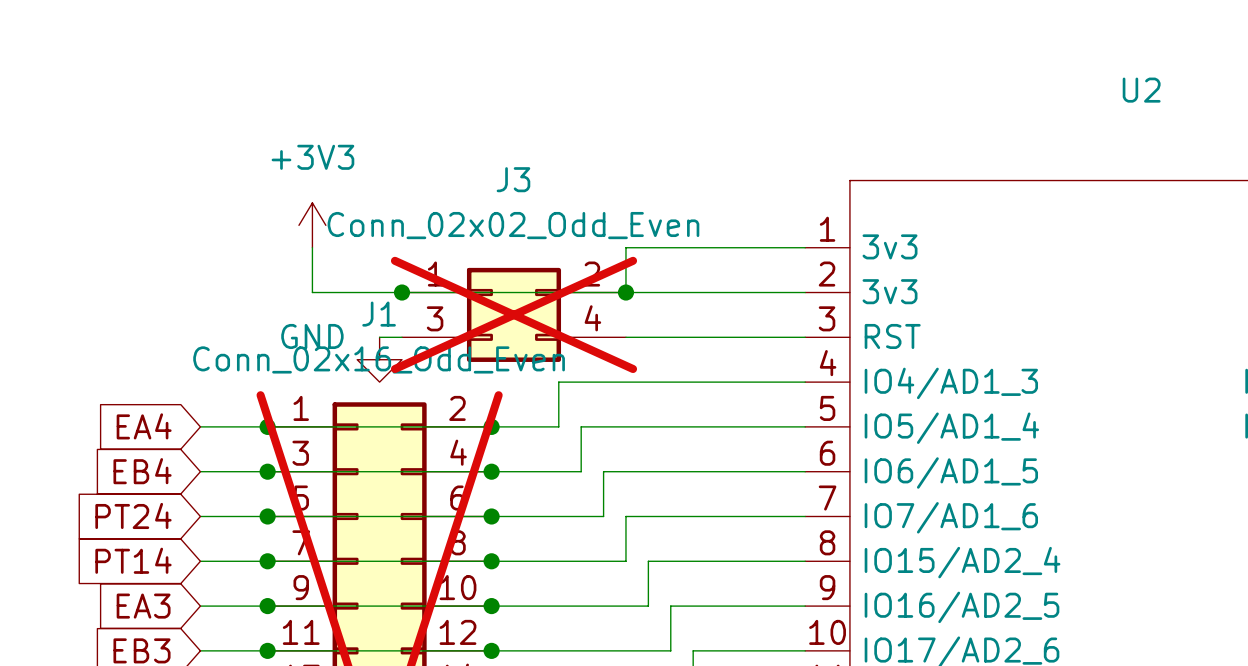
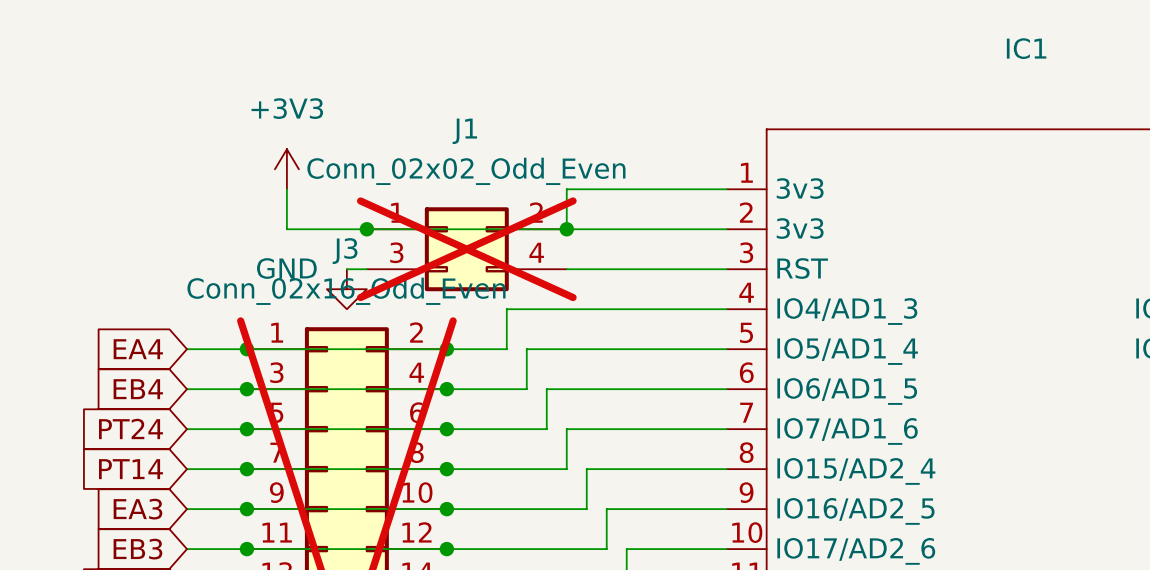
U2 name: U2 (1141, 90) -> IC1 (1026, 48)
J3 name: J3 (513, 179) -> J1 (464, 131)
J1 name: J1 (379, 314) -> J3 (345, 251)

